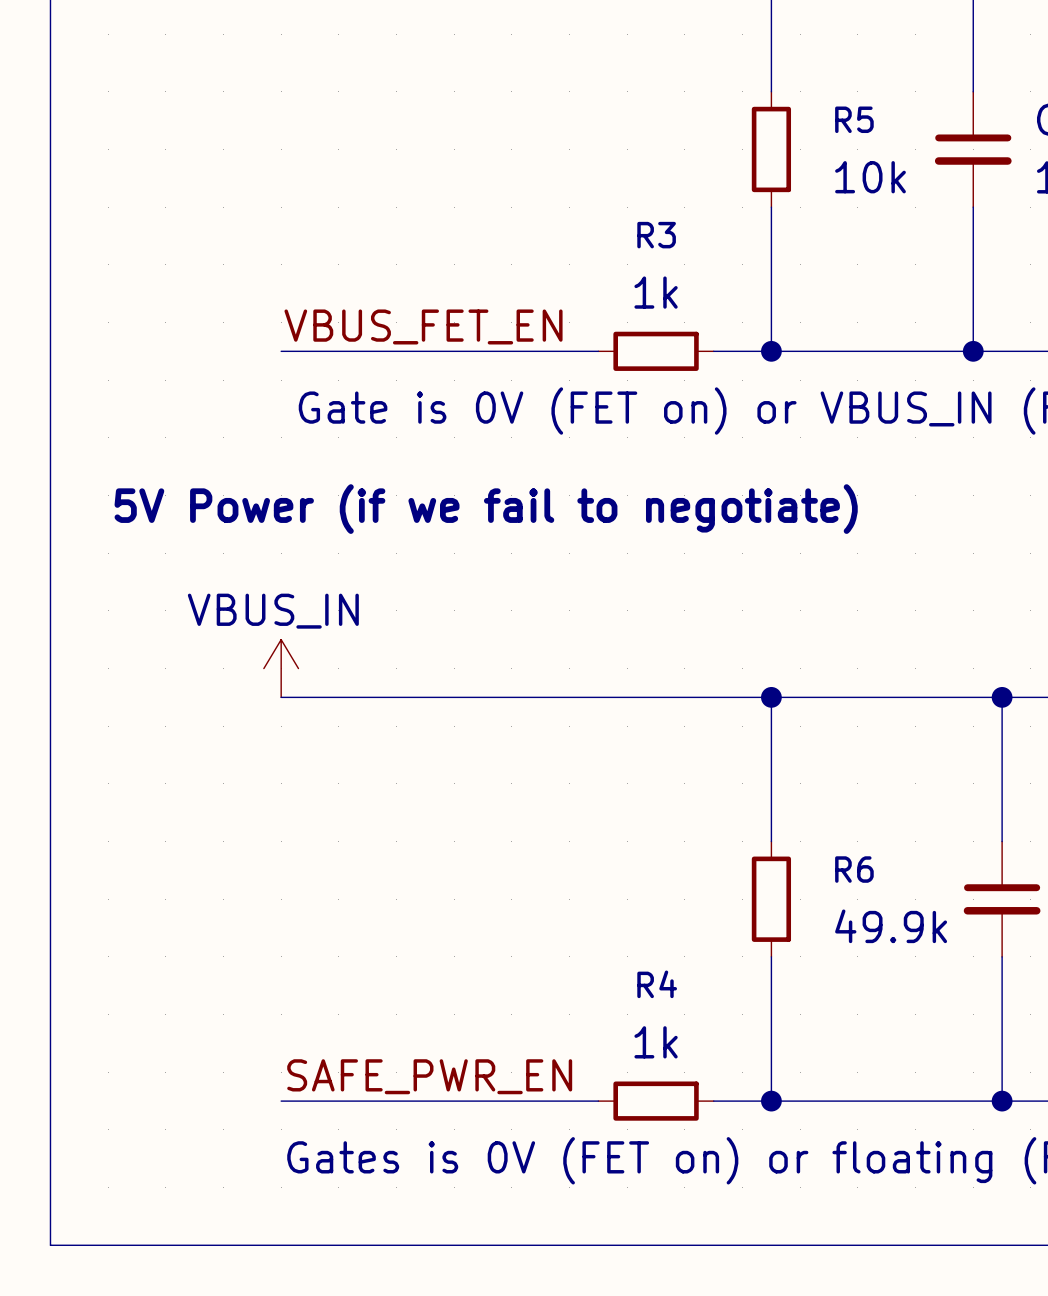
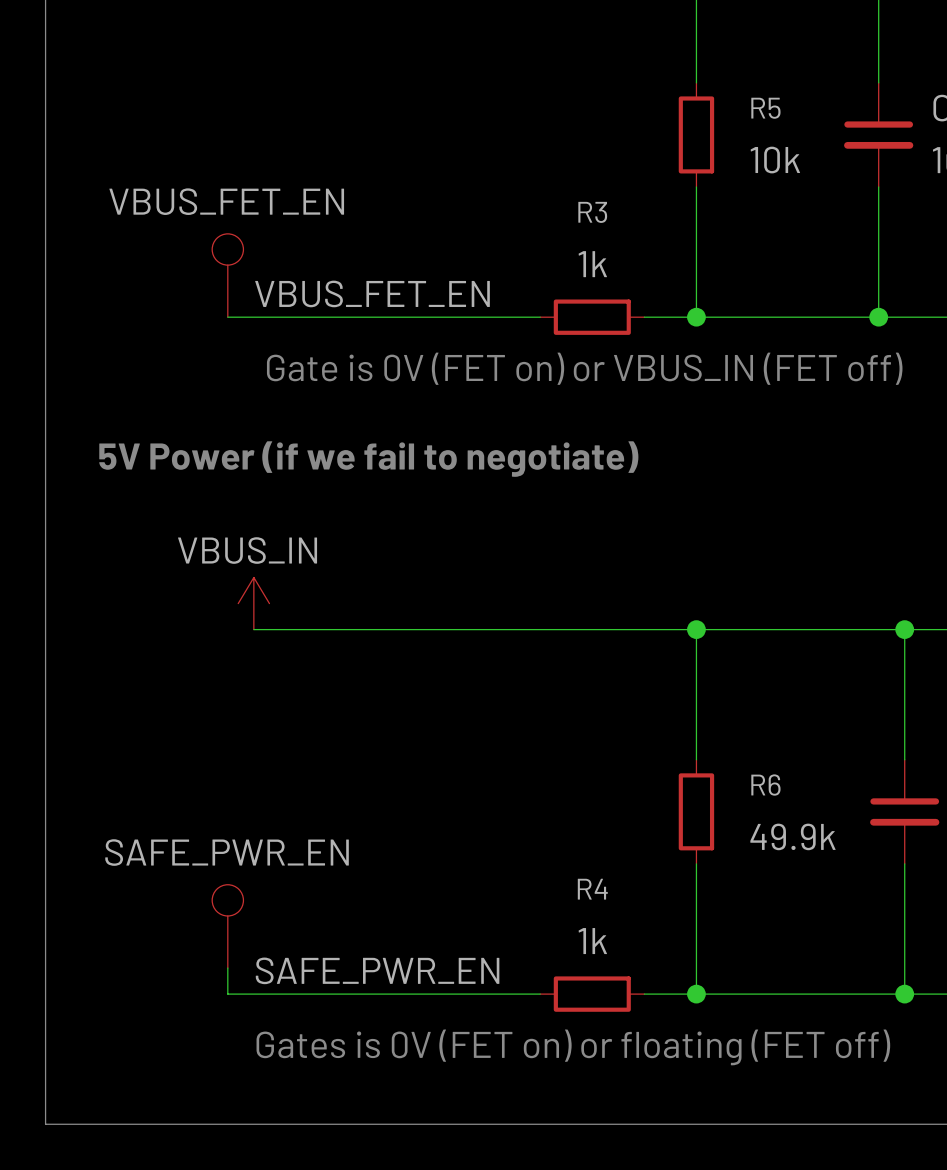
part: none -> VBUS_FET_EN (227, 275)
wire: none -> (227, 317) (253, 317)
part: none -> SAFE_PWR_EN (227, 926)
wire: none -> (227, 968) (227, 994) (253, 994)

